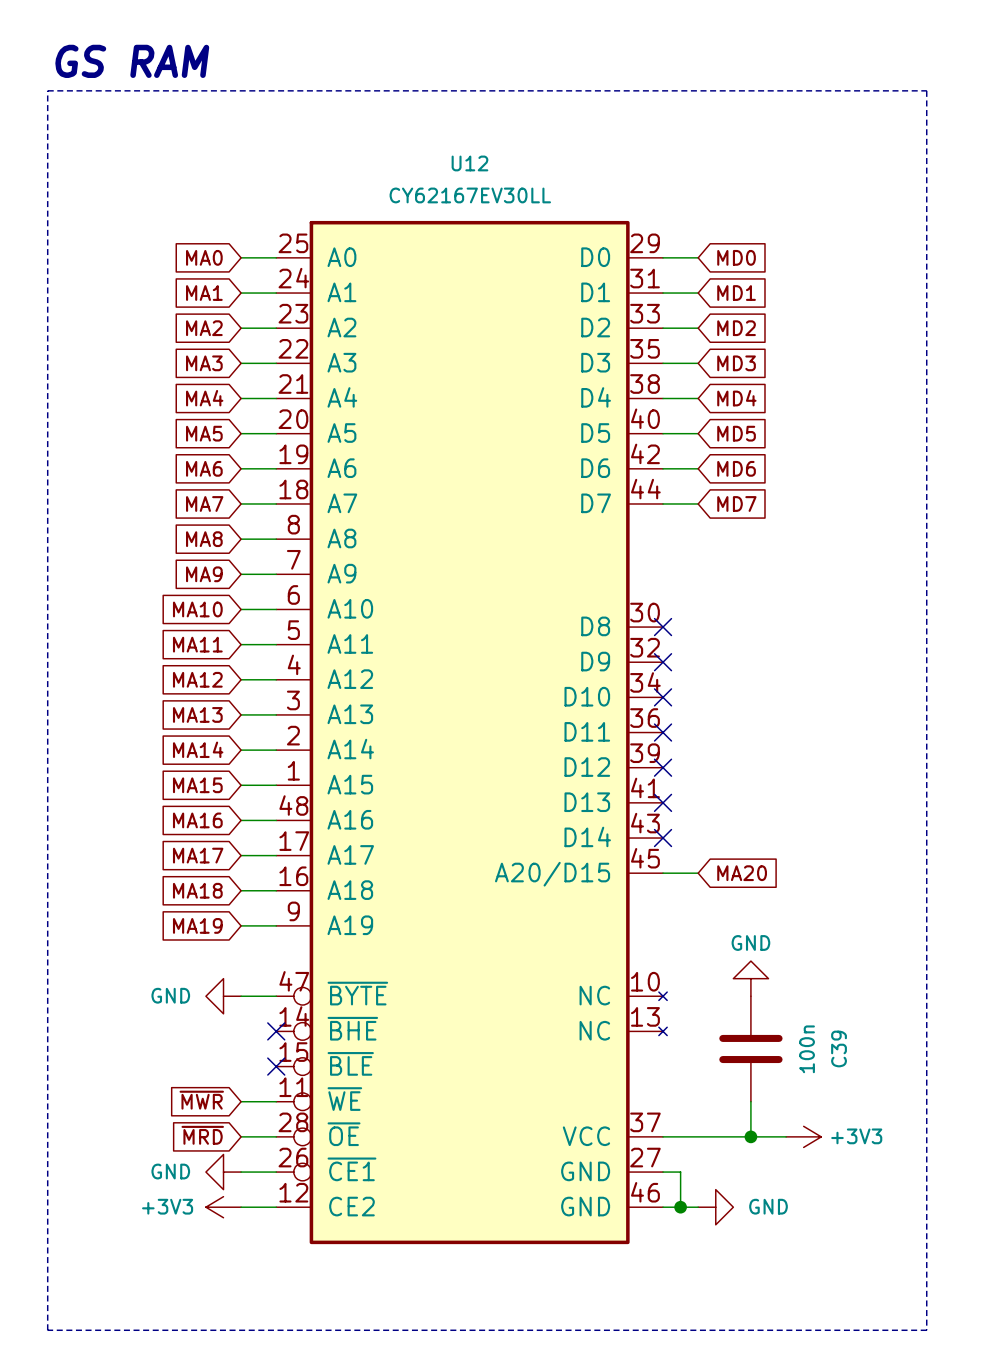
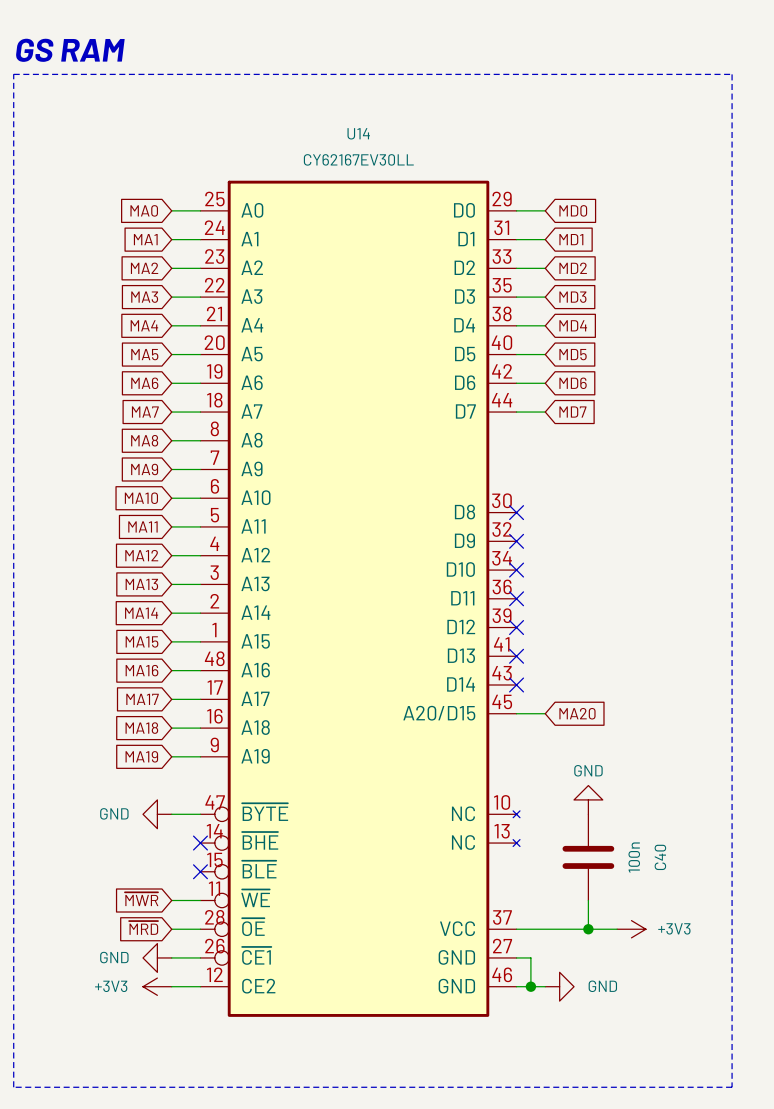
U12 name: U12 (469, 163) -> U14 (358, 133)
C39 name: C39 (839, 1048) -> C40 (660, 857)

